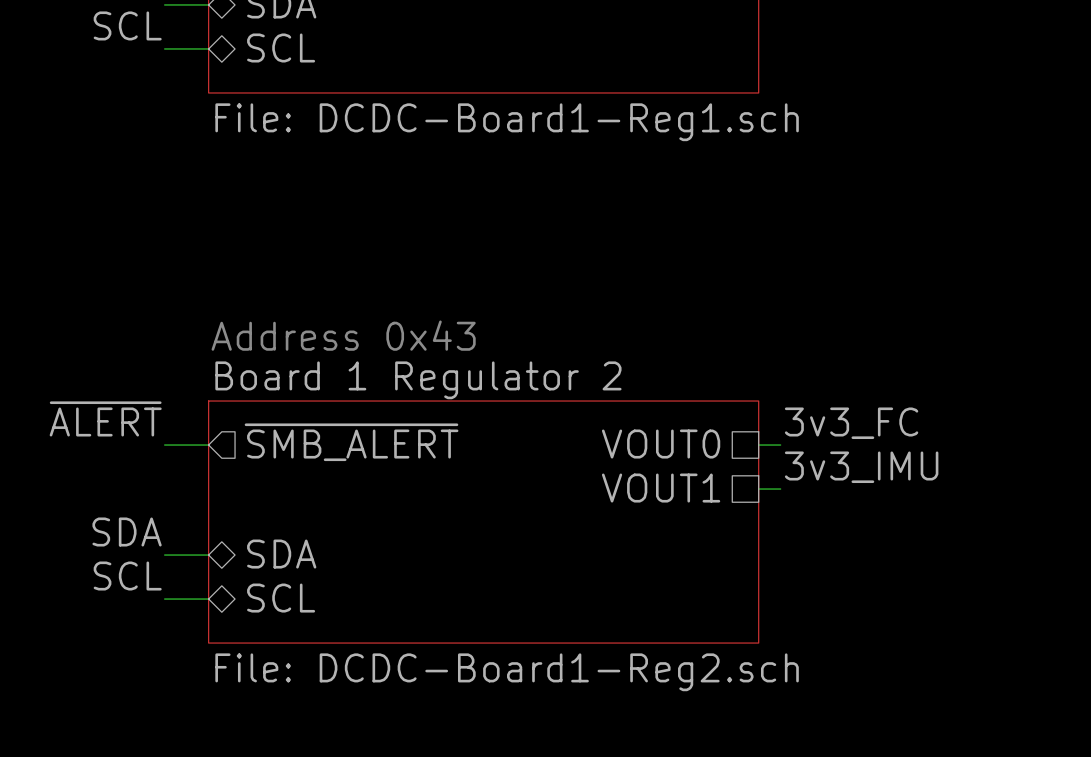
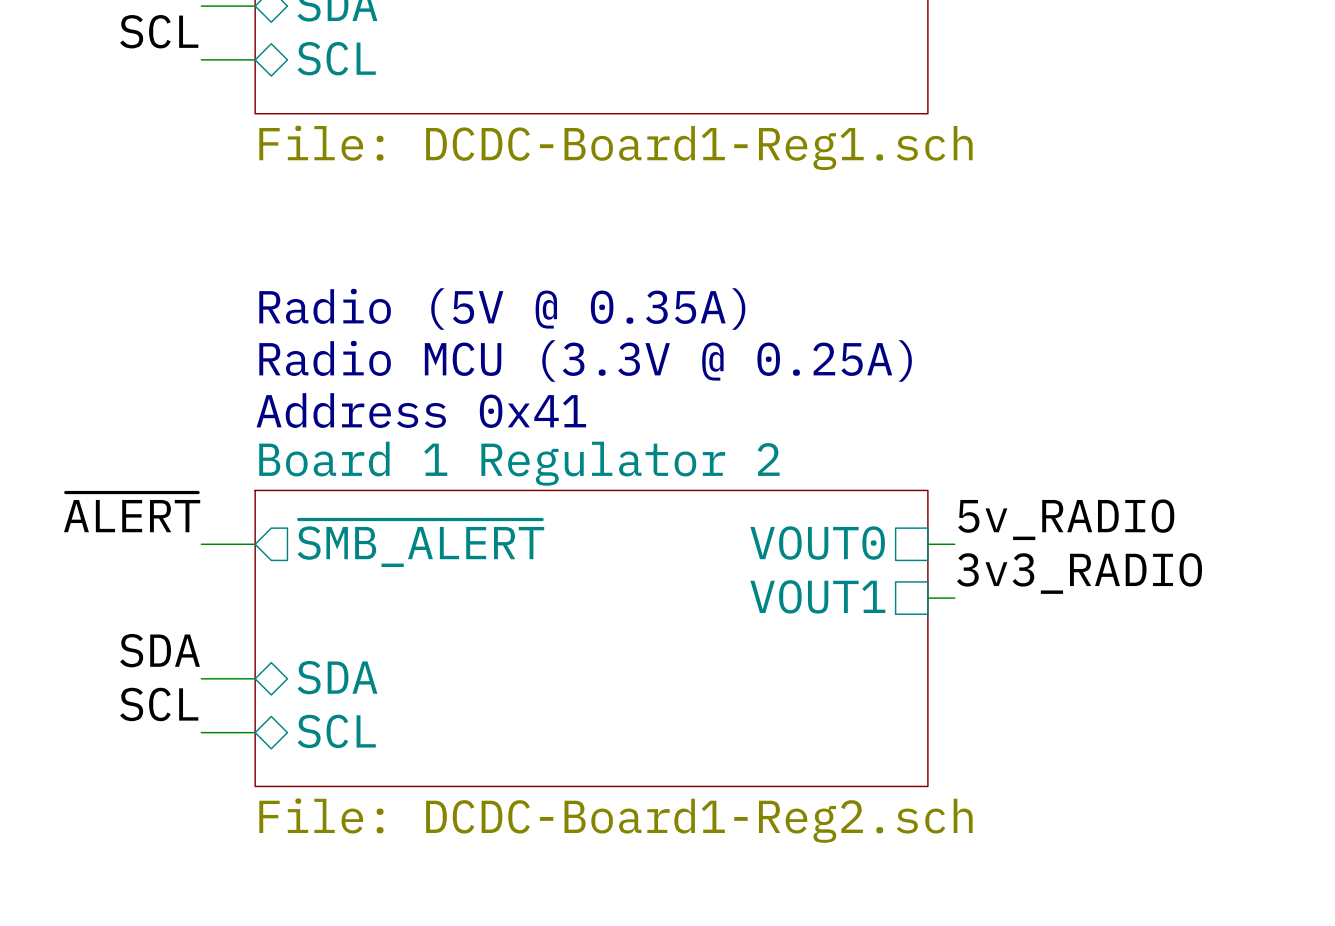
text: none -> Radio (5V @ 0.35A) (502, 309)
text: none -> Radio MCU (3.3V @ 0.25A) (585, 361)
text: Address 0x43 (343, 335) -> Address 0x41 (421, 410)
label: 3v3_FC (851, 423) -> 5v_RADIO (1066, 519)
label: 3v3_IMU (861, 467) -> 3v3_RADIO (1079, 573)

